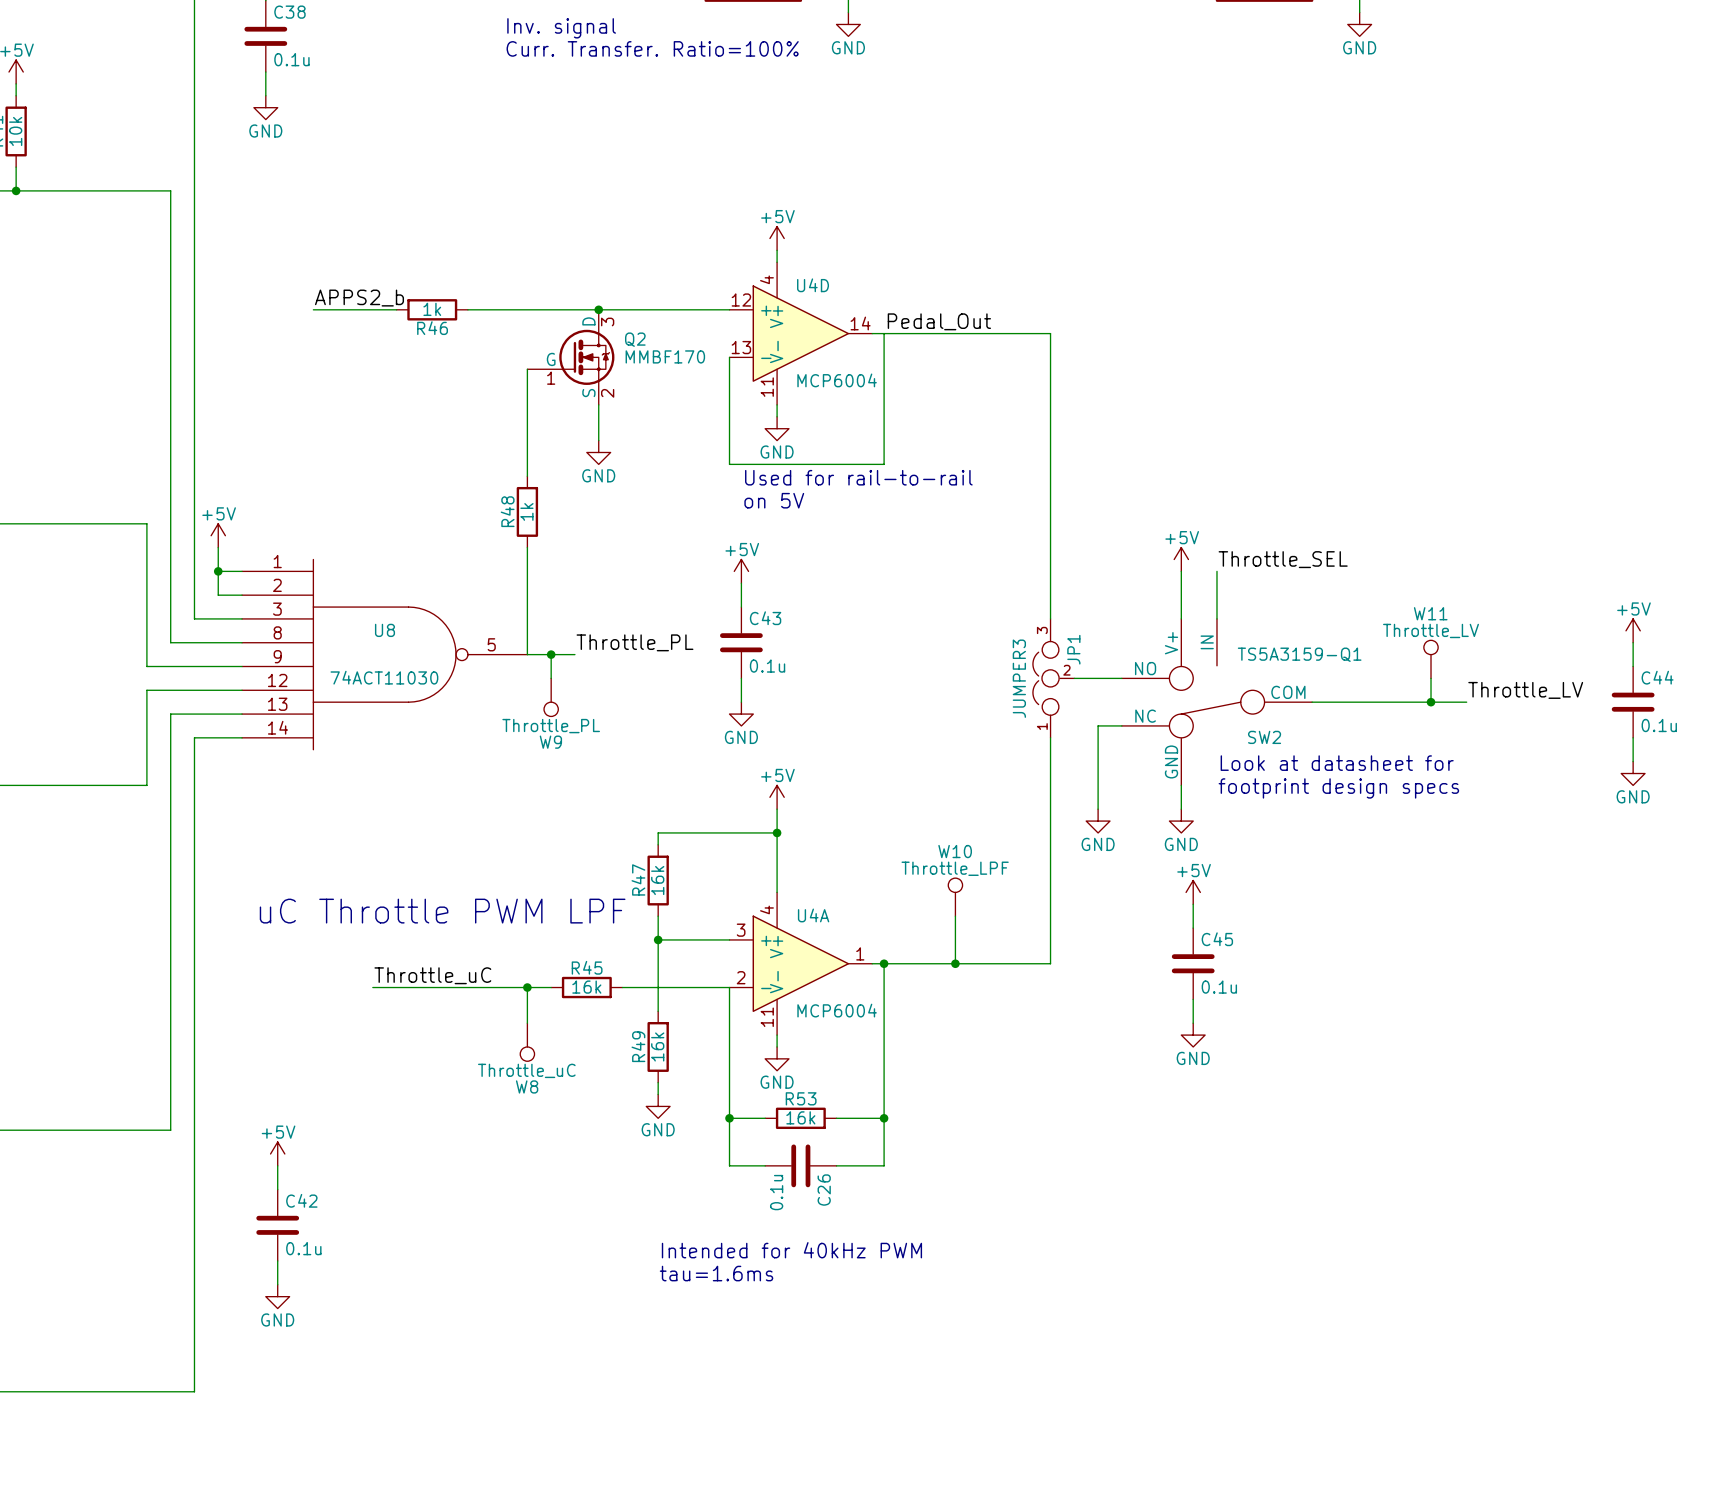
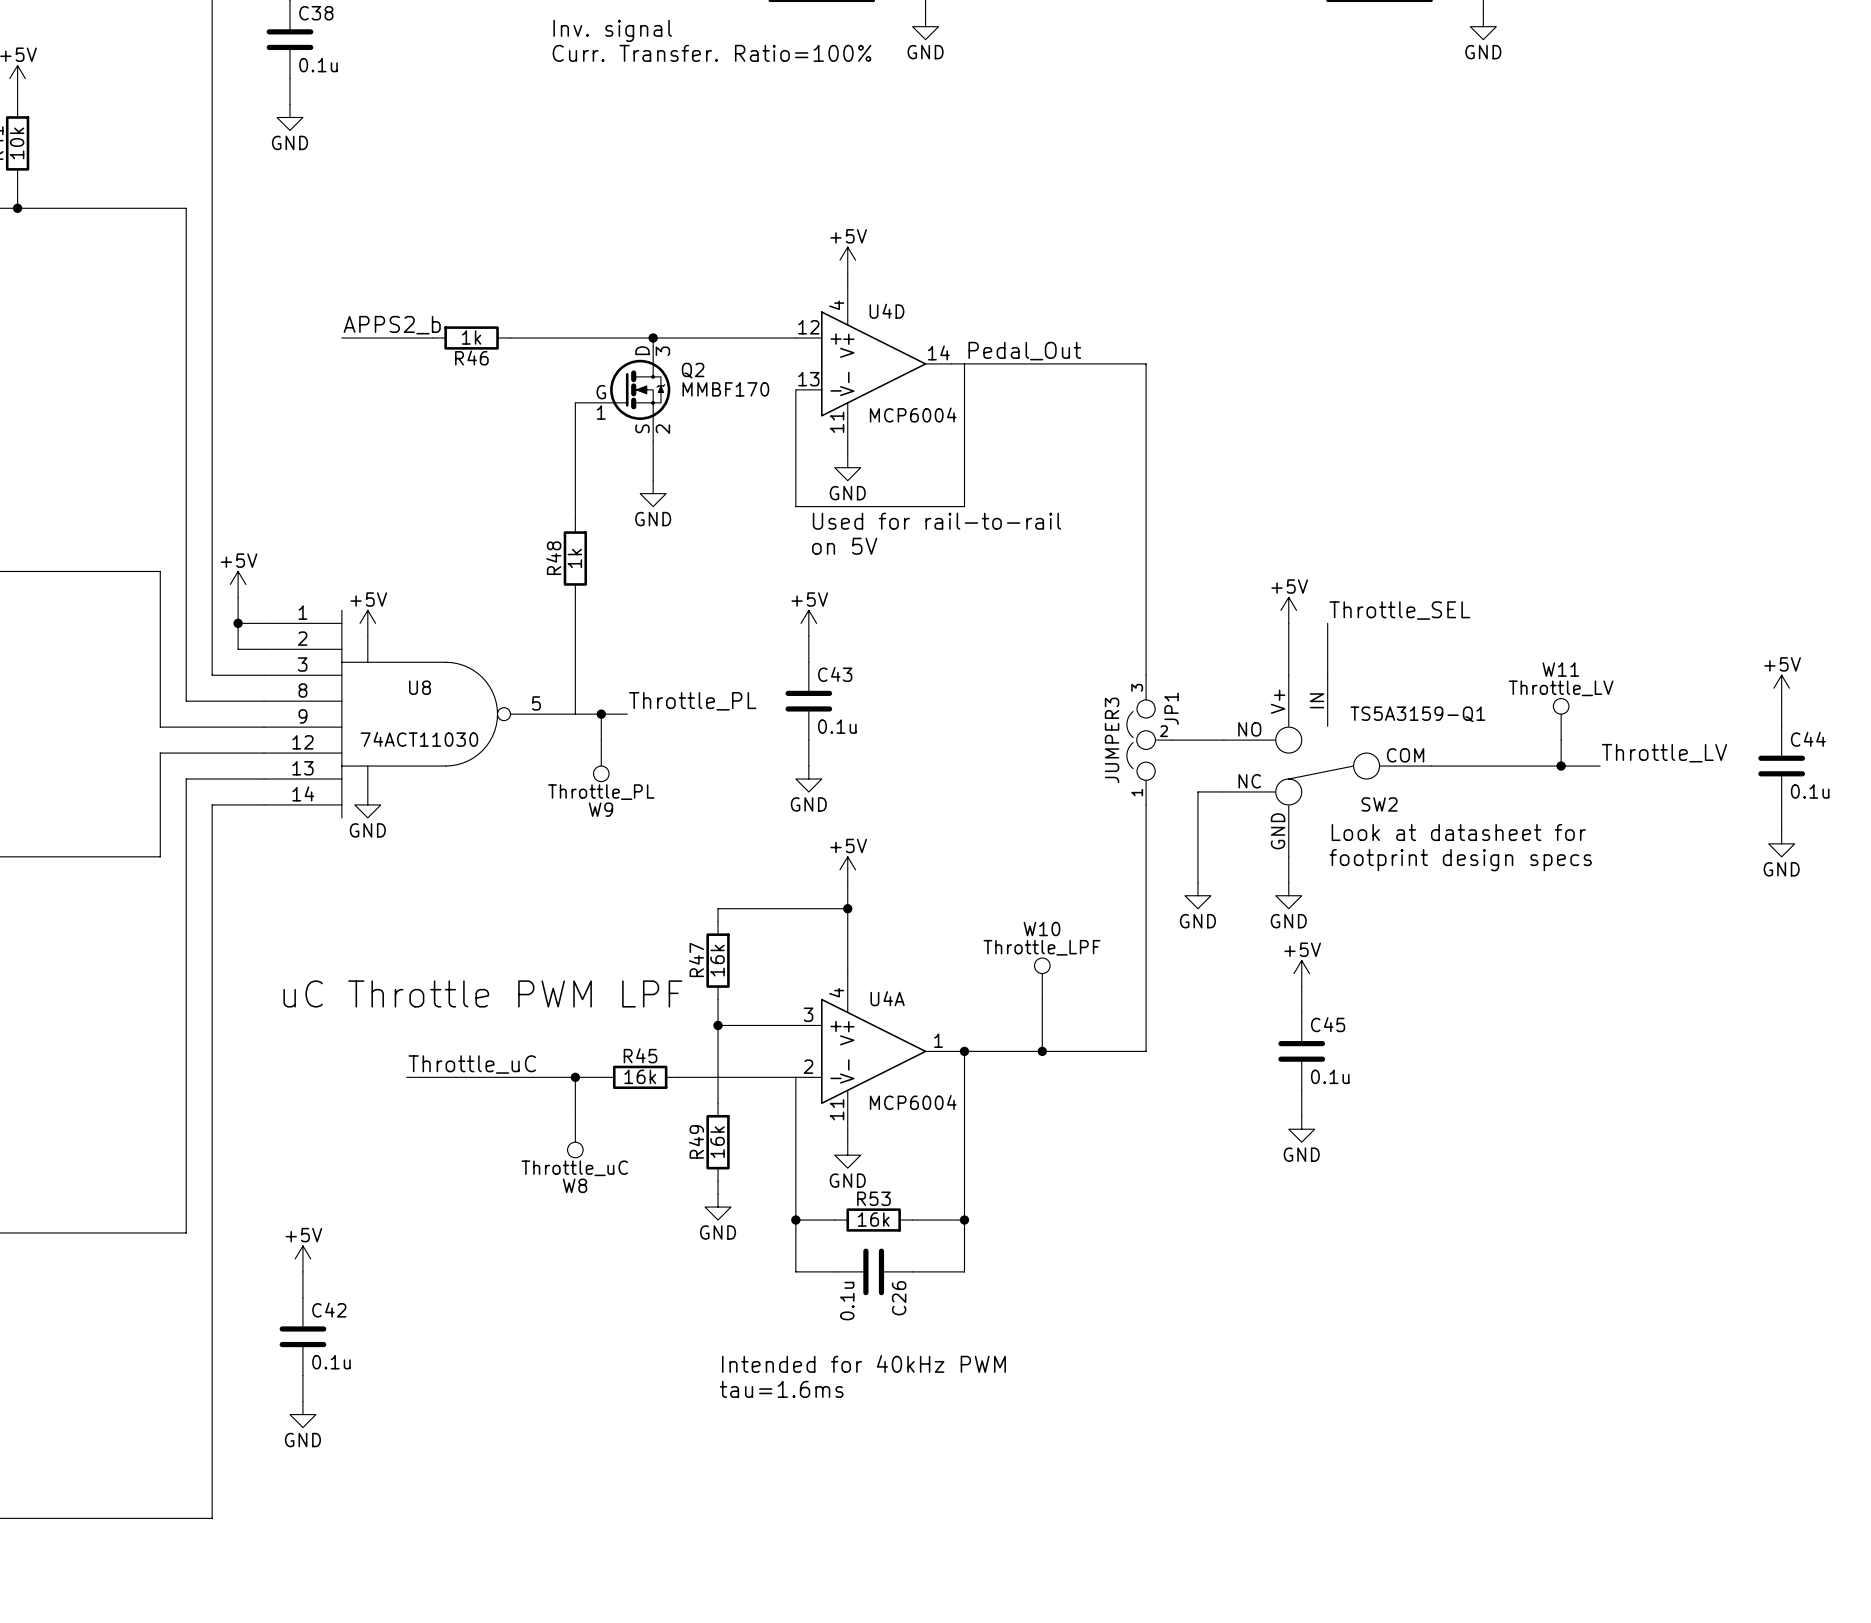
power symbol: none -> +5V (367, 623)
wire: none -> (367, 636) (367, 662)
wire: none -> (367, 766) (367, 791)
power symbol: none -> GND (367, 804)

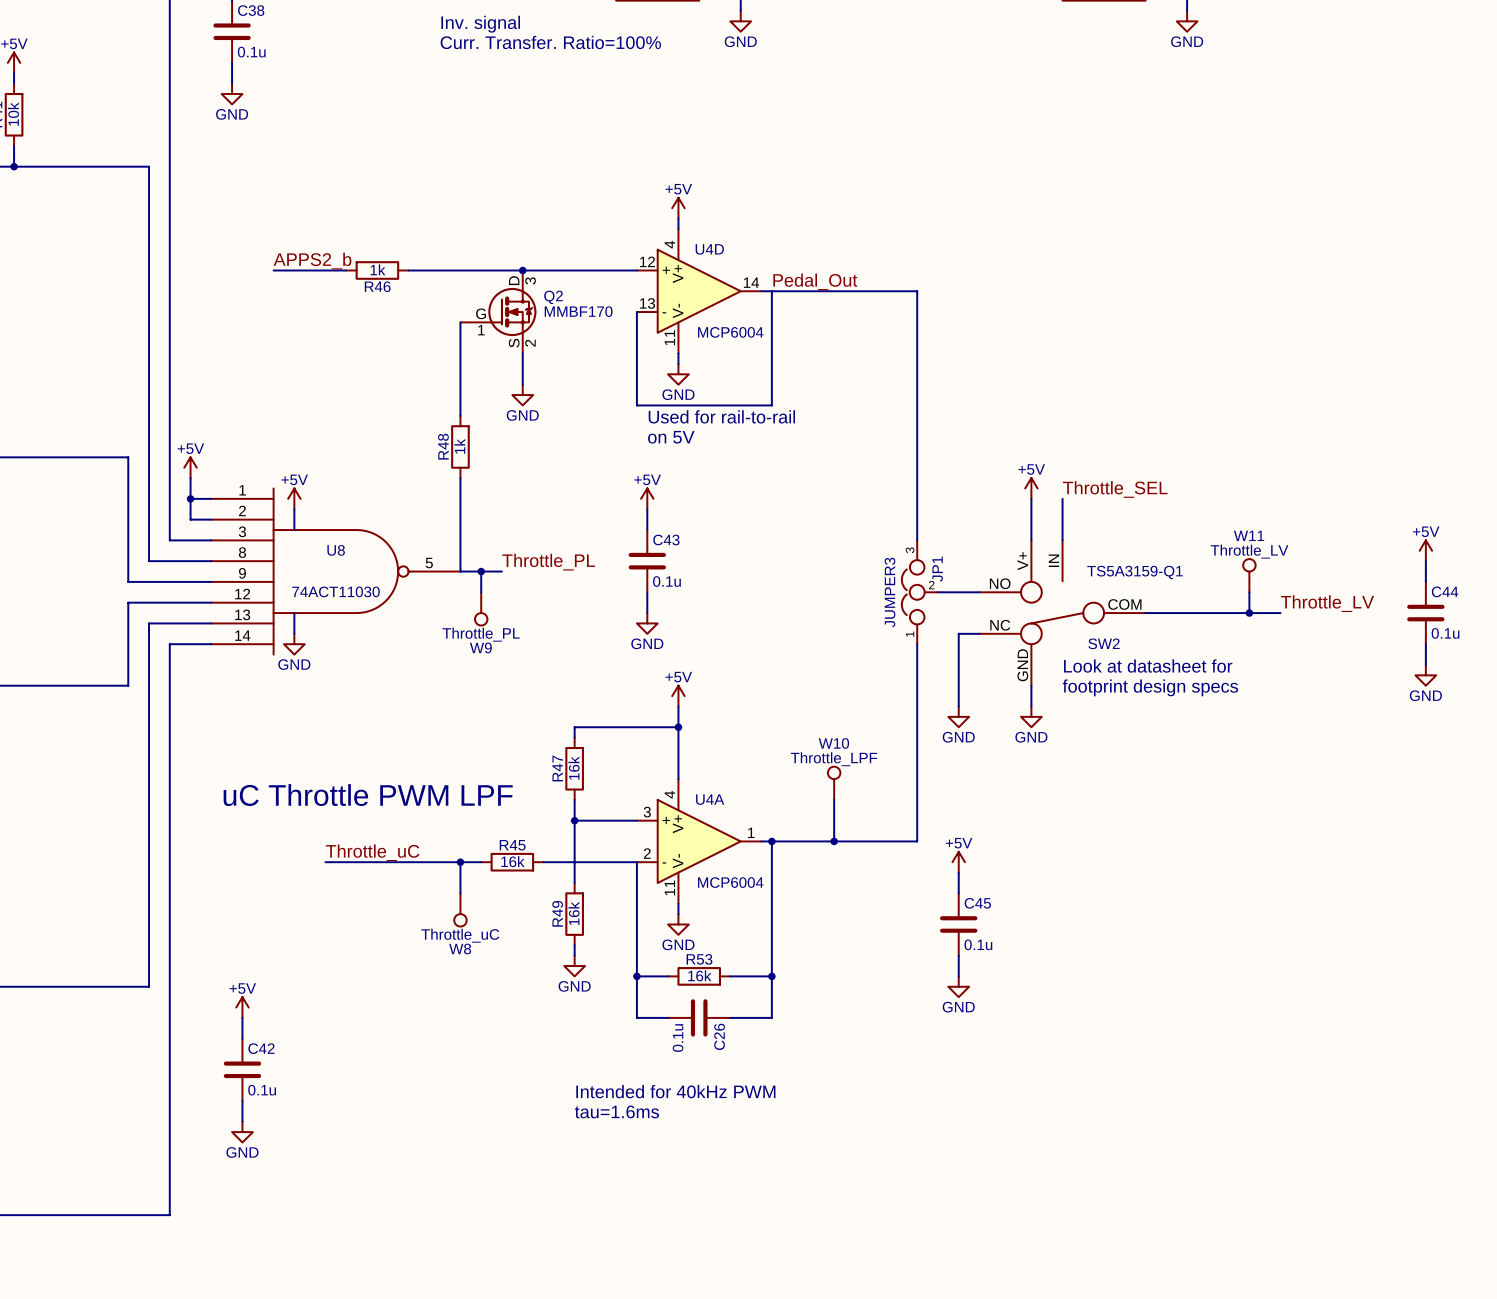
power symbol position: +5V (1301, 973) -> +5V (958, 862)
wire: (1301, 986) (1301, 1012) -> (958, 955) (958, 976)
C45 position: (1301, 1051) -> (958, 924)
wire: (1301, 1090) (1301, 1116) -> (958, 872) (958, 893)
power symbol position: GND (1301, 1129) -> GND (958, 986)

